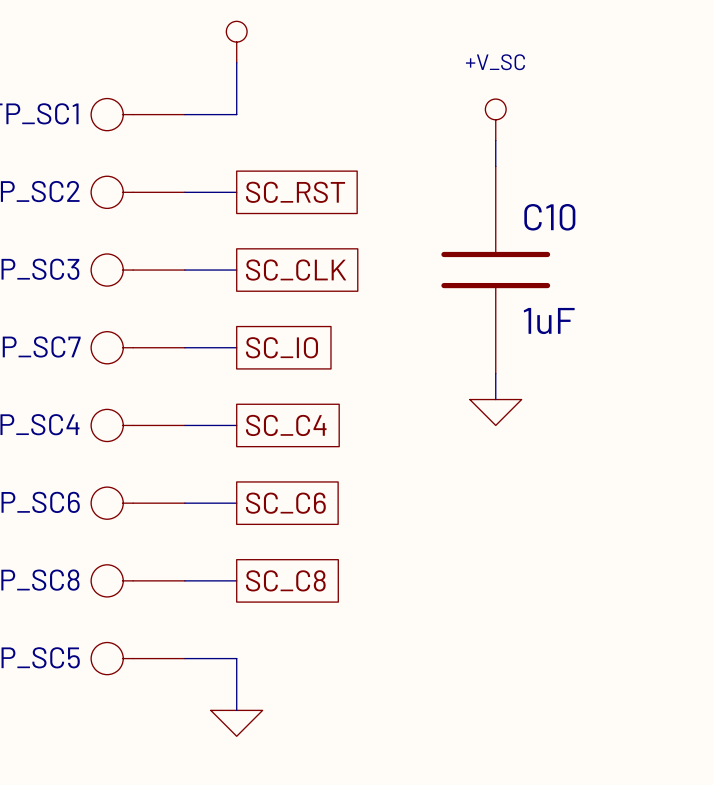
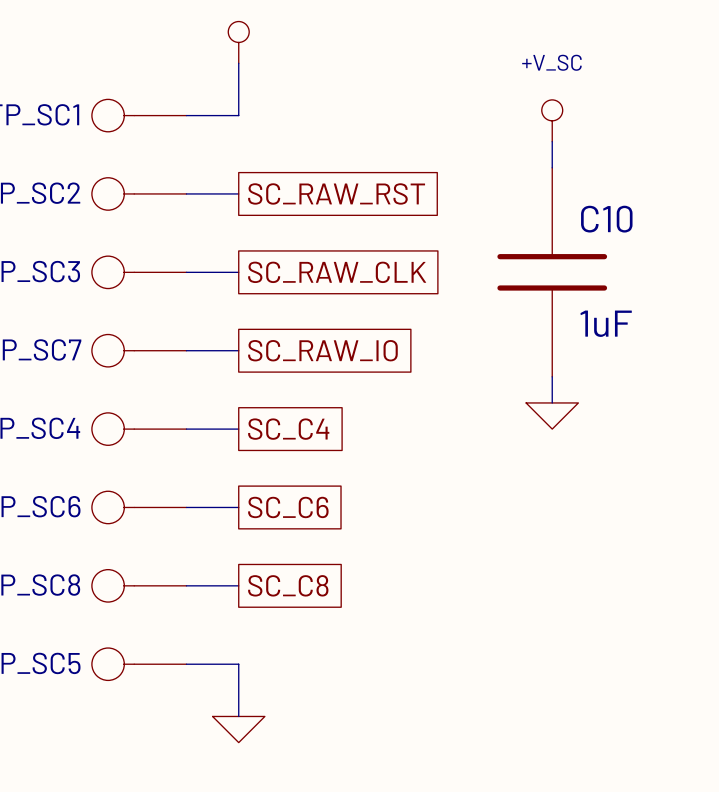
power symbol position: +V_SC (495, 119) -> +V_SC (552, 120)
wire: (495, 140) (495, 166) -> (552, 141) (552, 167)
global label: SC_RST (295, 192) -> SC_RAW_RST (336, 193)
global label: SC_CLK (296, 270) -> SC_RAW_CLK (337, 272)
C10 position: (495, 270) -> (552, 272)
global label: SC_IO (282, 347) -> SC_RAW_IO (322, 350)
wire: (495, 373) (495, 399) -> (552, 376) (552, 402)
power symbol position: (495, 412) -> (552, 416)

